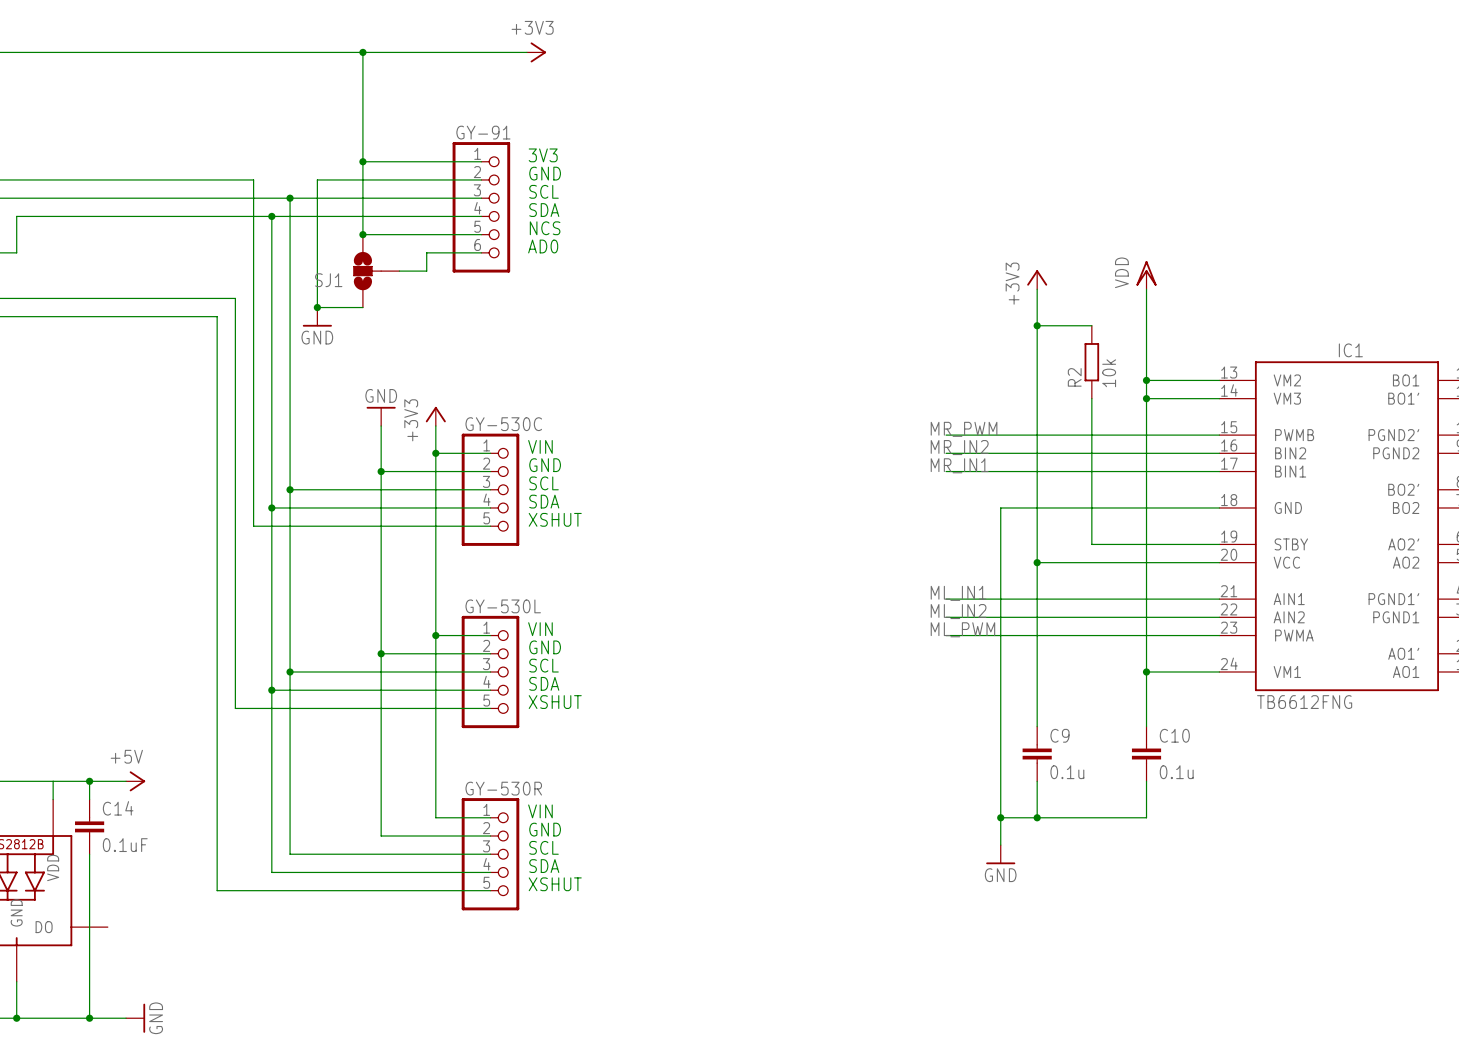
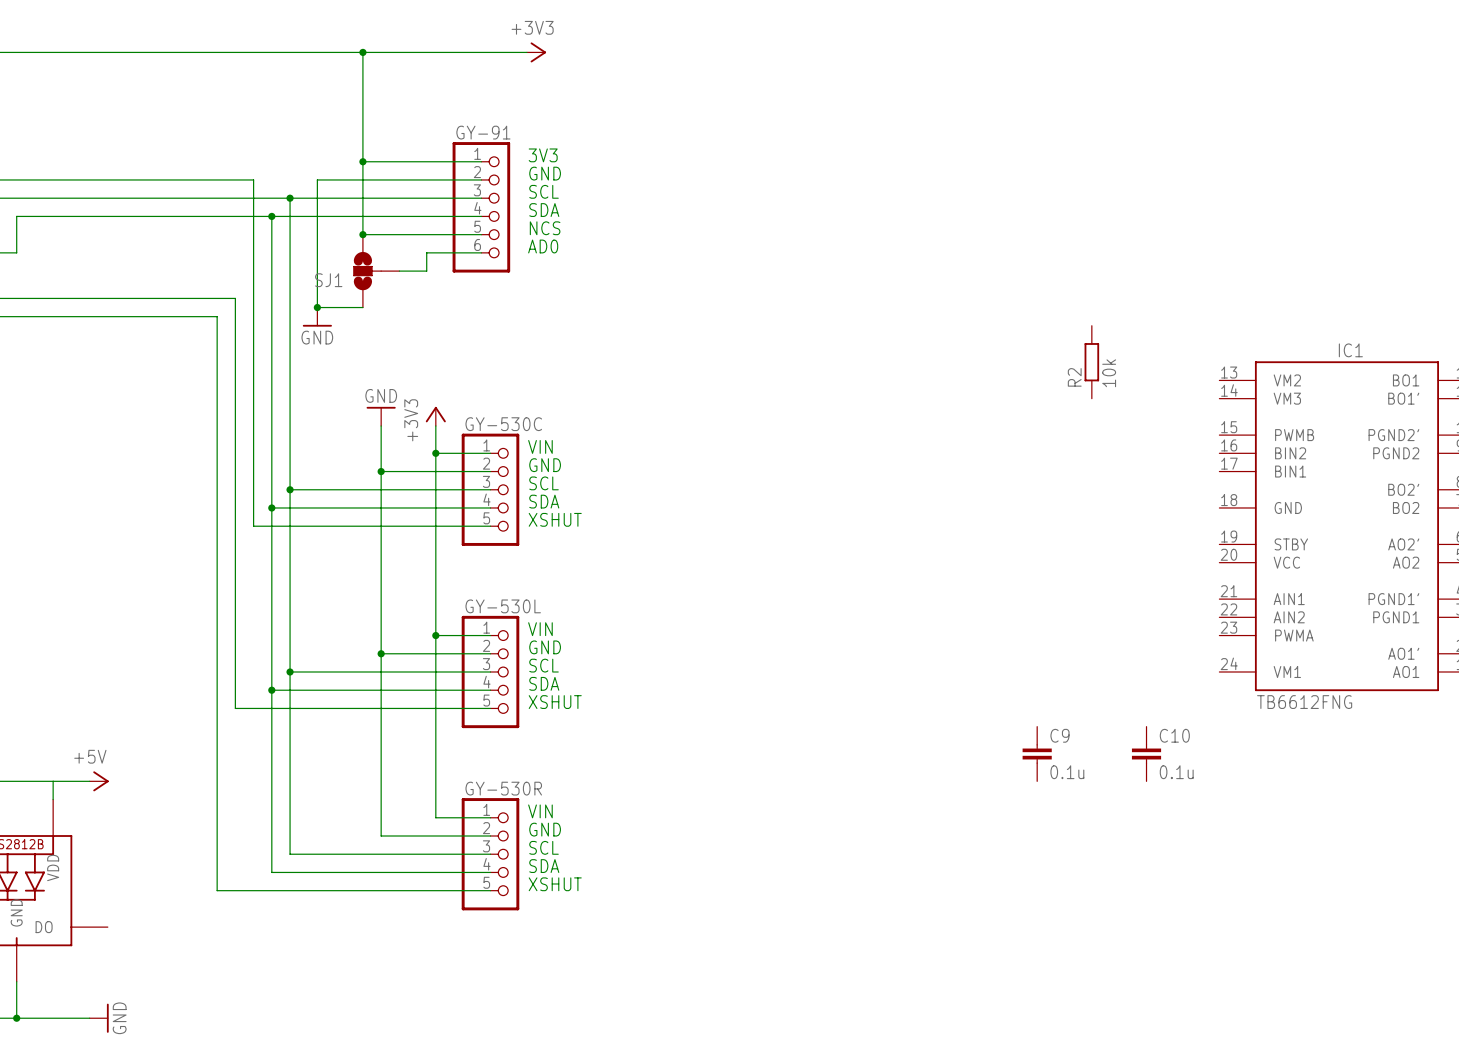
power symbol: VDD (1146, 275) -> none
power symbol: +3V3 (1037, 279) -> none
wire: (1037, 289) (1037, 726) -> none
wire: (1146, 289) (1146, 726) -> none
wire: (1037, 325) (1091, 325) -> none
junction: (1037, 325) -> none
wire: (1146, 380) (1219, 380) -> none
junction: (1146, 380) -> none
wire: (1091, 398) (1091, 544) (1219, 544) -> none
wire: (1146, 398) (1219, 398) -> none
junction: (1146, 398) -> none
label: MR_PWM (964, 429) -> none
wire: (946, 435) (1219, 435) -> none
label: MR_IN2 (959, 447) -> none
wire: (946, 453) (1219, 453) -> none
label: MR_IN1 (959, 465) -> none
wire: (946, 471) (1219, 471) -> none
wire: (1219, 507) (1000, 507) (1000, 845) -> none
wire: (1037, 562) (1219, 562) -> none
junction: (1037, 562) -> none
label: ML_IN1 (958, 593) -> none
wire: (946, 599) (1219, 599) -> none
label: ML_IN2 (958, 611) -> none
wire: (946, 617) (1219, 617) -> none
label: ML_PWM (962, 629) -> none
wire: (946, 635) (1219, 635) -> none
wire: (1146, 671) (1219, 671) -> none
junction: (1146, 671) -> none
junction: (89, 781) -> none
wire: (126, 781) (89, 781) (89, 799) -> none
power symbol position: +5V (135, 781) -> +5V (99, 781)
wire: (1037, 781) (1037, 817) -> none
wire: (1146, 781) (1146, 817) (1000, 817) -> none
junction: (1000, 817) -> none
junction: (1037, 817) -> none
C14: 0.1uF (89, 826) -> none
wire: (89, 854) (89, 1018) (126, 1018) -> none
power symbol: GND (1000, 854) -> none
junction: (89, 1018) -> none
power symbol position: GND (135, 1018) -> GND (99, 1018)

